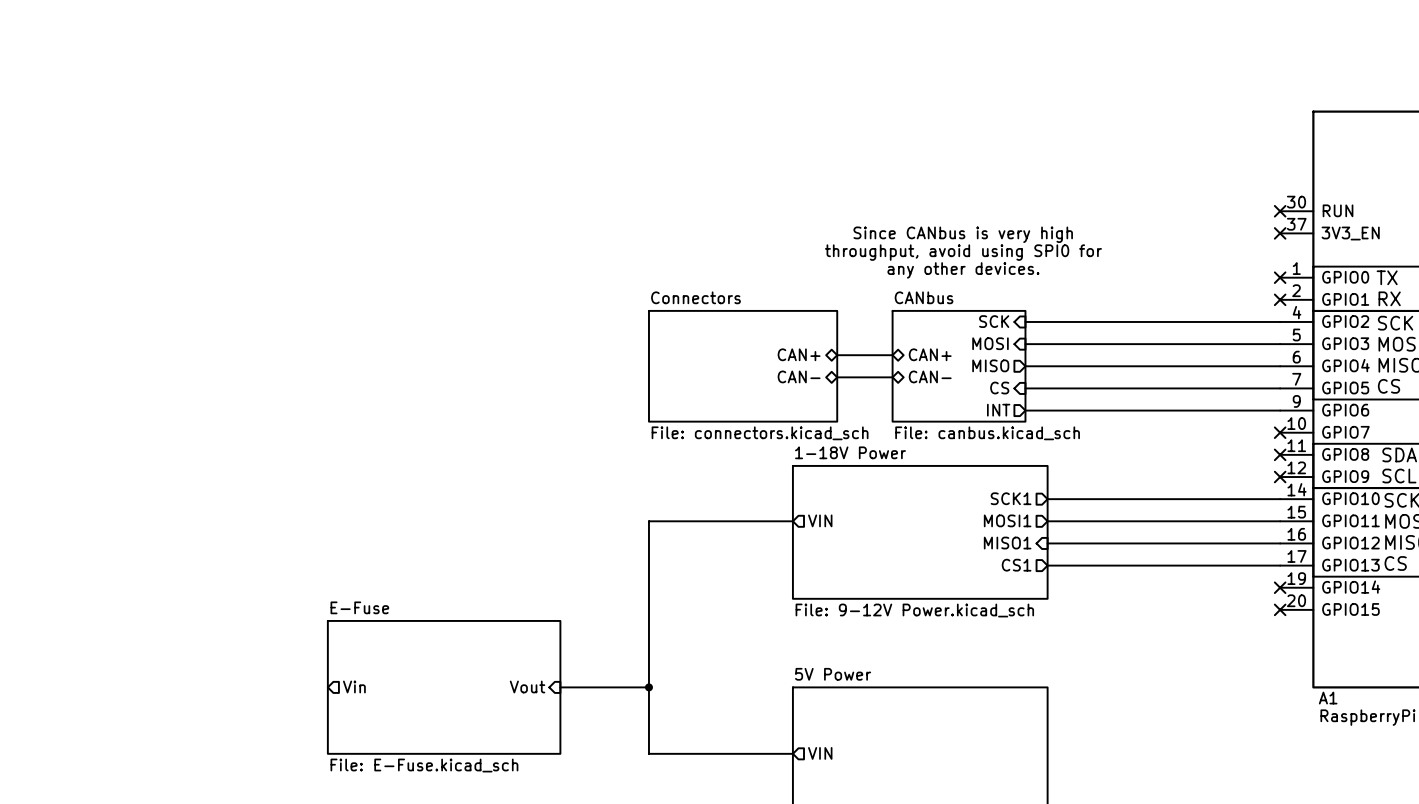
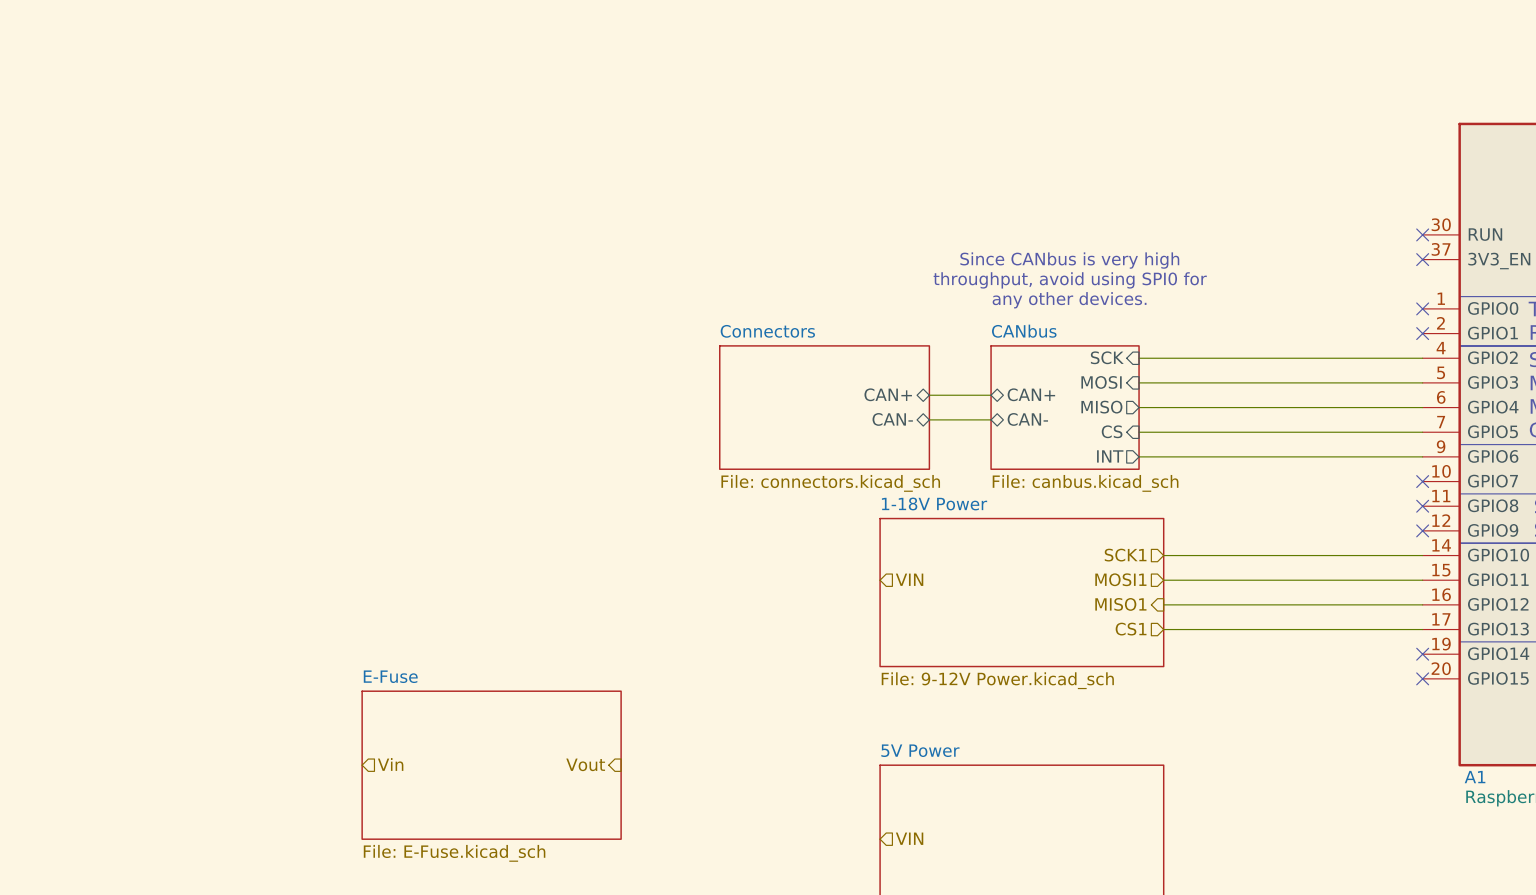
wire: (792, 521) (648, 521) (648, 753) (792, 753) -> none
wire: (560, 687) (648, 687) -> none
junction: (648, 687) -> none

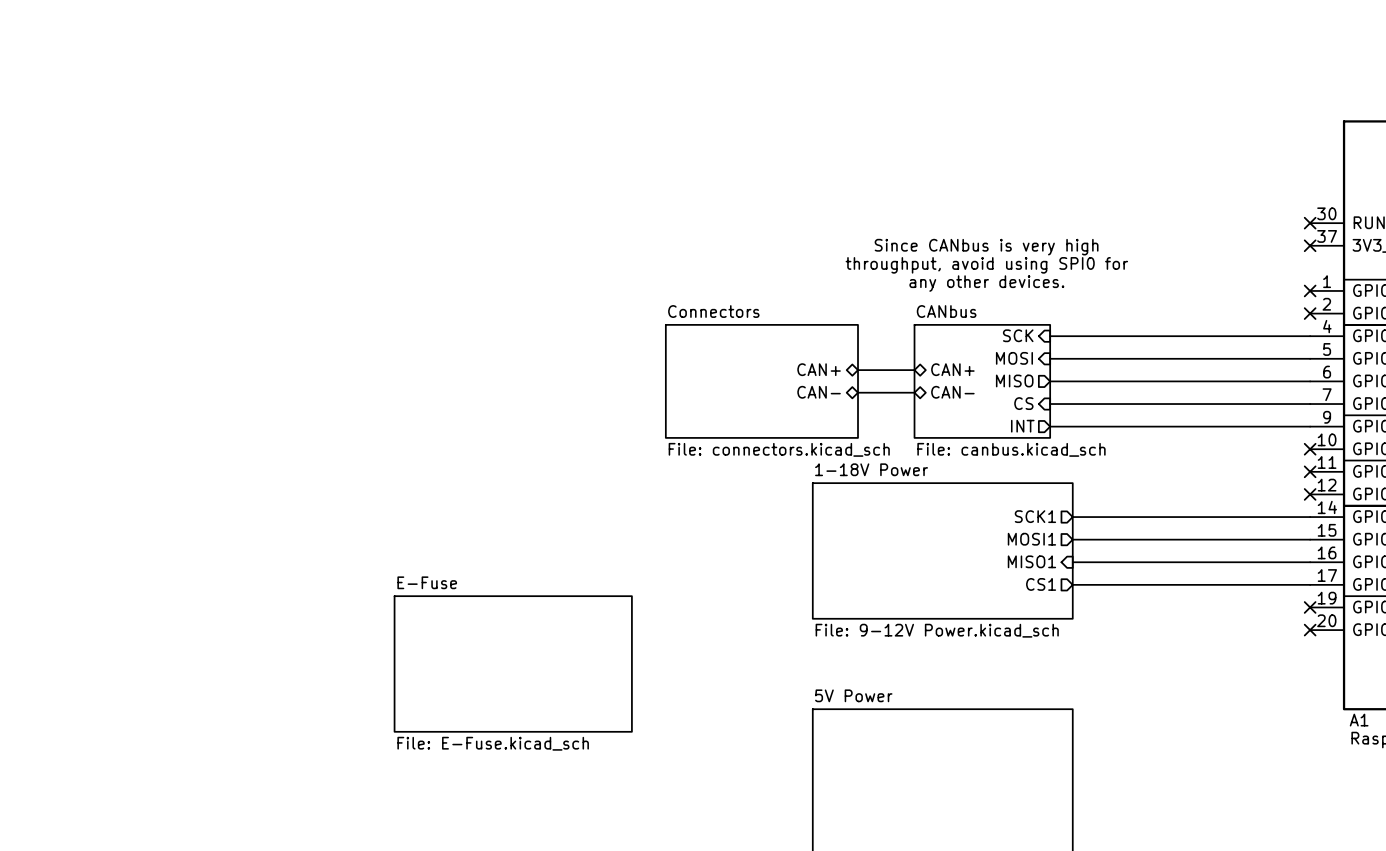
hierarchical label: VIN (909, 579) -> none
hierarchical label: Vin (390, 764) -> none
hierarchical label: Vout (585, 764) -> none
sheet E-Fuse position: (491, 765) -> (513, 663)
hierarchical label: VIN (909, 838) -> none

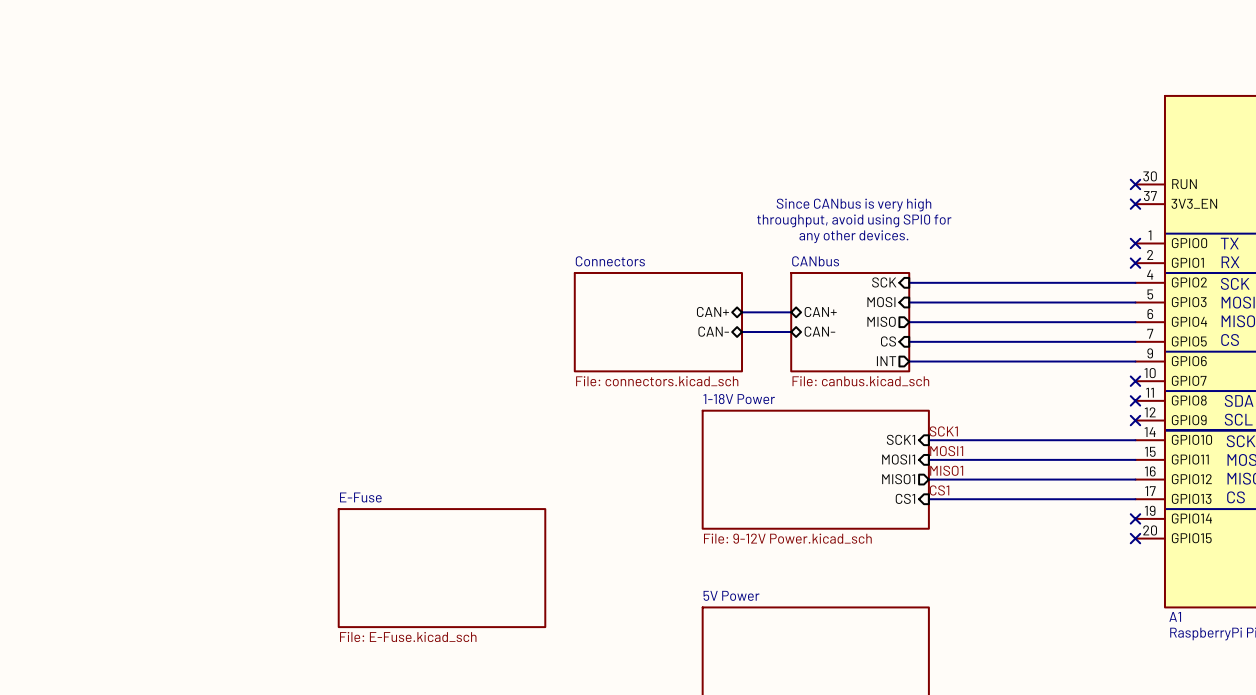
label: none -> SCK1 (943, 431)
hierarchical label: SCK1 (1035, 516) -> none
sheet pin: none -> SCK1 (901, 439)
label: none -> MOSI1 (946, 451)
hierarchical label: MOSI1 (1031, 539) -> none
sheet pin: none -> MOSI1 (898, 459)
label: none -> MISO1 (946, 470)
hierarchical label: MISO1 (1031, 561) -> none
sheet pin: none -> MISO1 (898, 479)
label: none -> CS1 (939, 490)
hierarchical label: CS1 (1041, 584) -> none
sheet pin: none -> CS1 (905, 498)

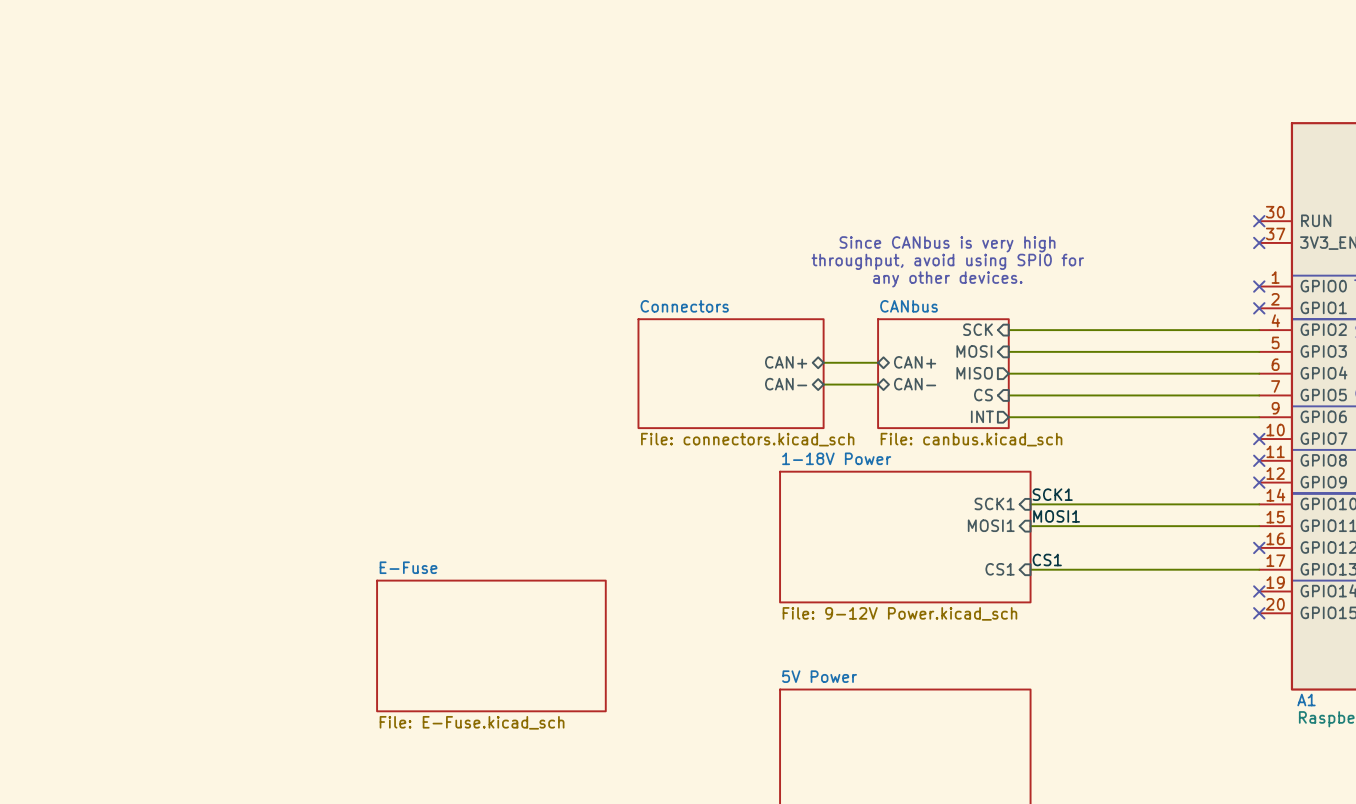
label: MISO1 (946, 470) -> none
sheet pin: MISO1 (898, 479) -> none
wire: (928, 479) (1135, 479) -> none
no-connect mark: none -> (1259, 547)

